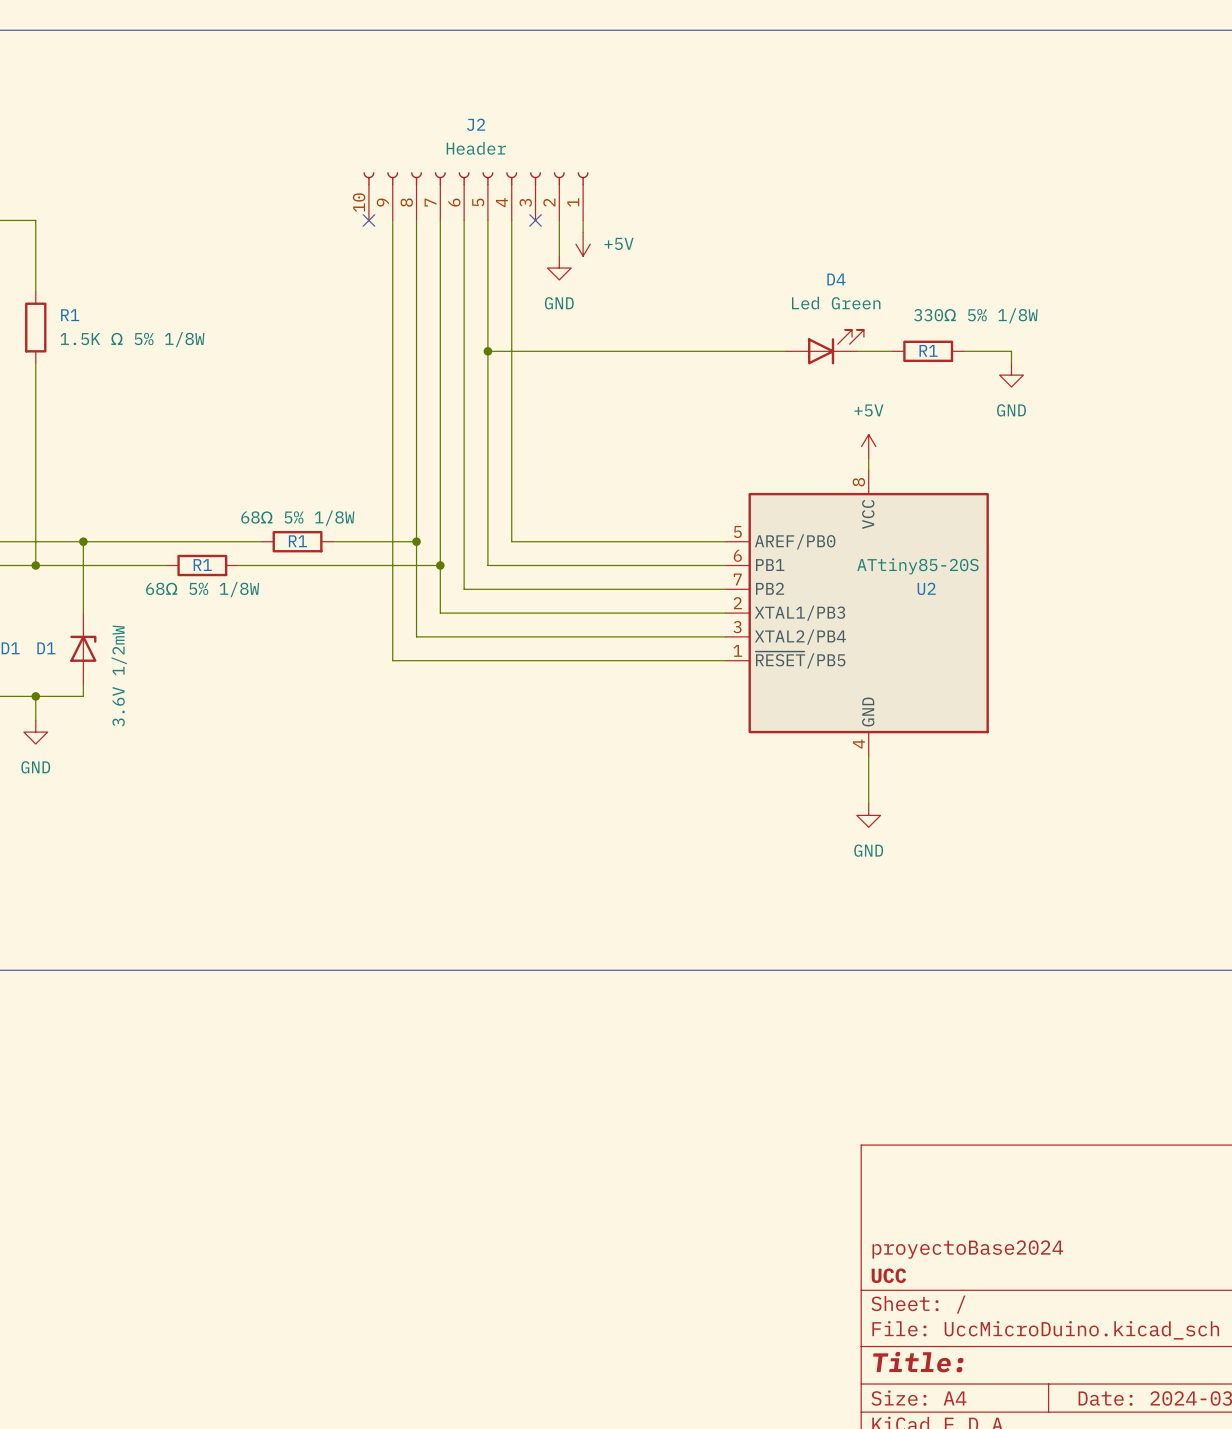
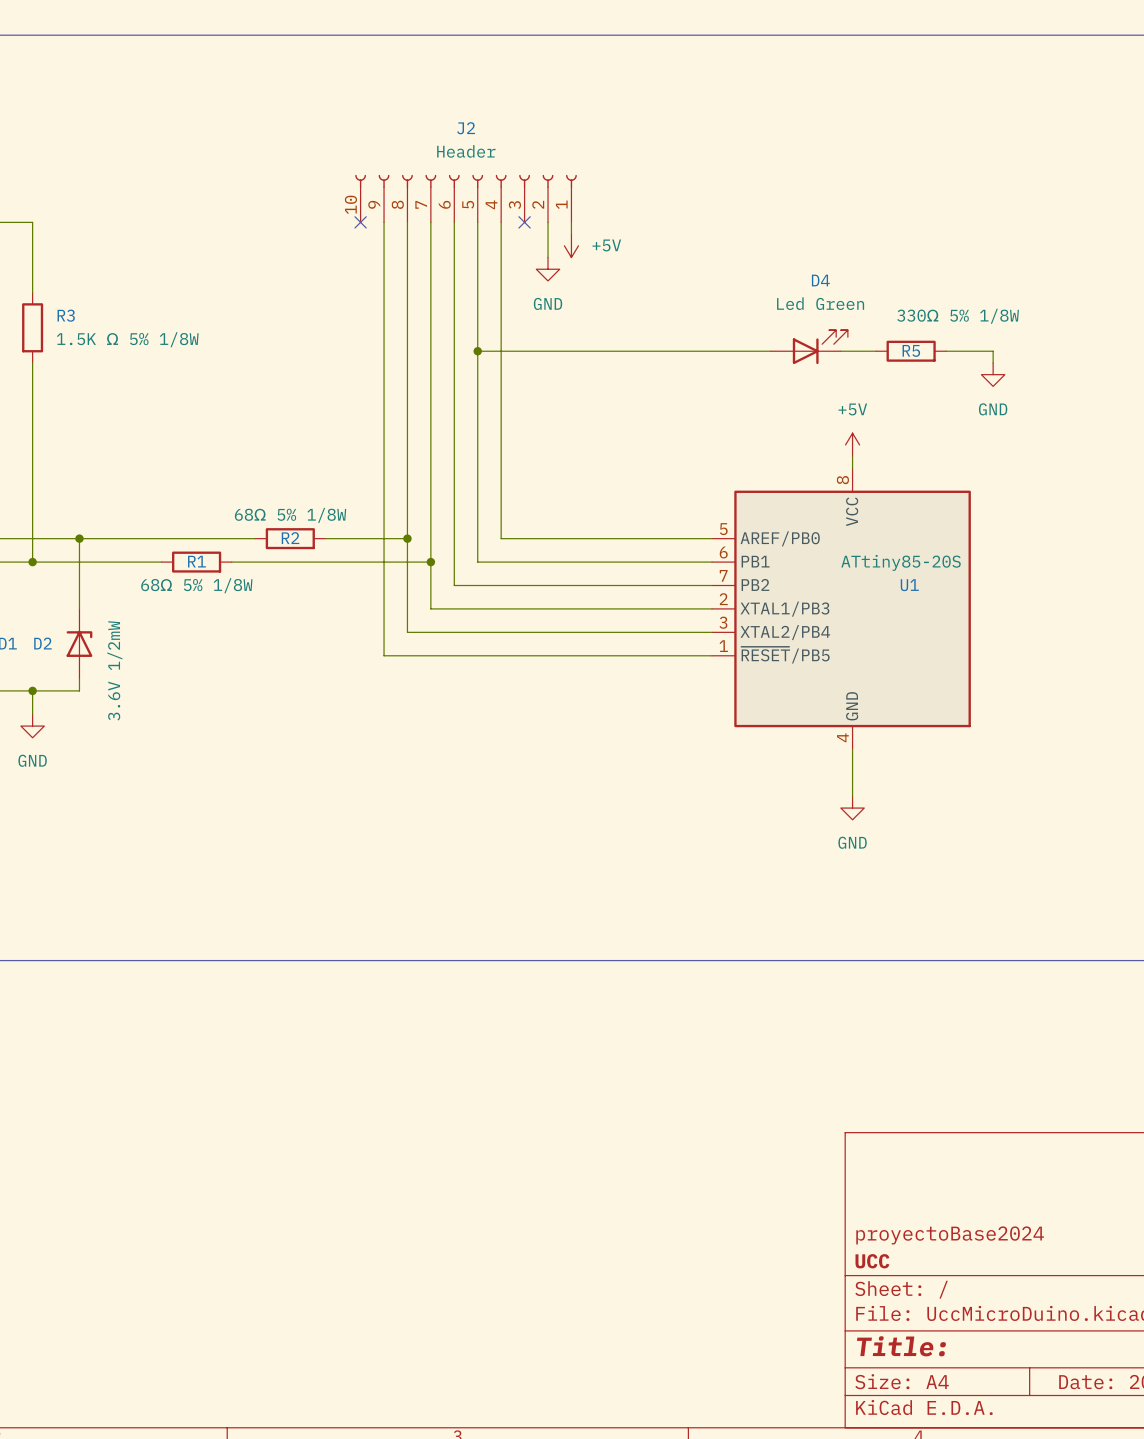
R1 name: R1 (70, 315) -> R3 (66, 315)
R1 name: R1 (928, 350) -> R5 (911, 350)
R1 name: R1 (297, 541) -> R2 (290, 538)
U2 name: U2 (926, 588) -> U1 (909, 585)
D1 name: D1 (46, 648) -> D2 (42, 643)

